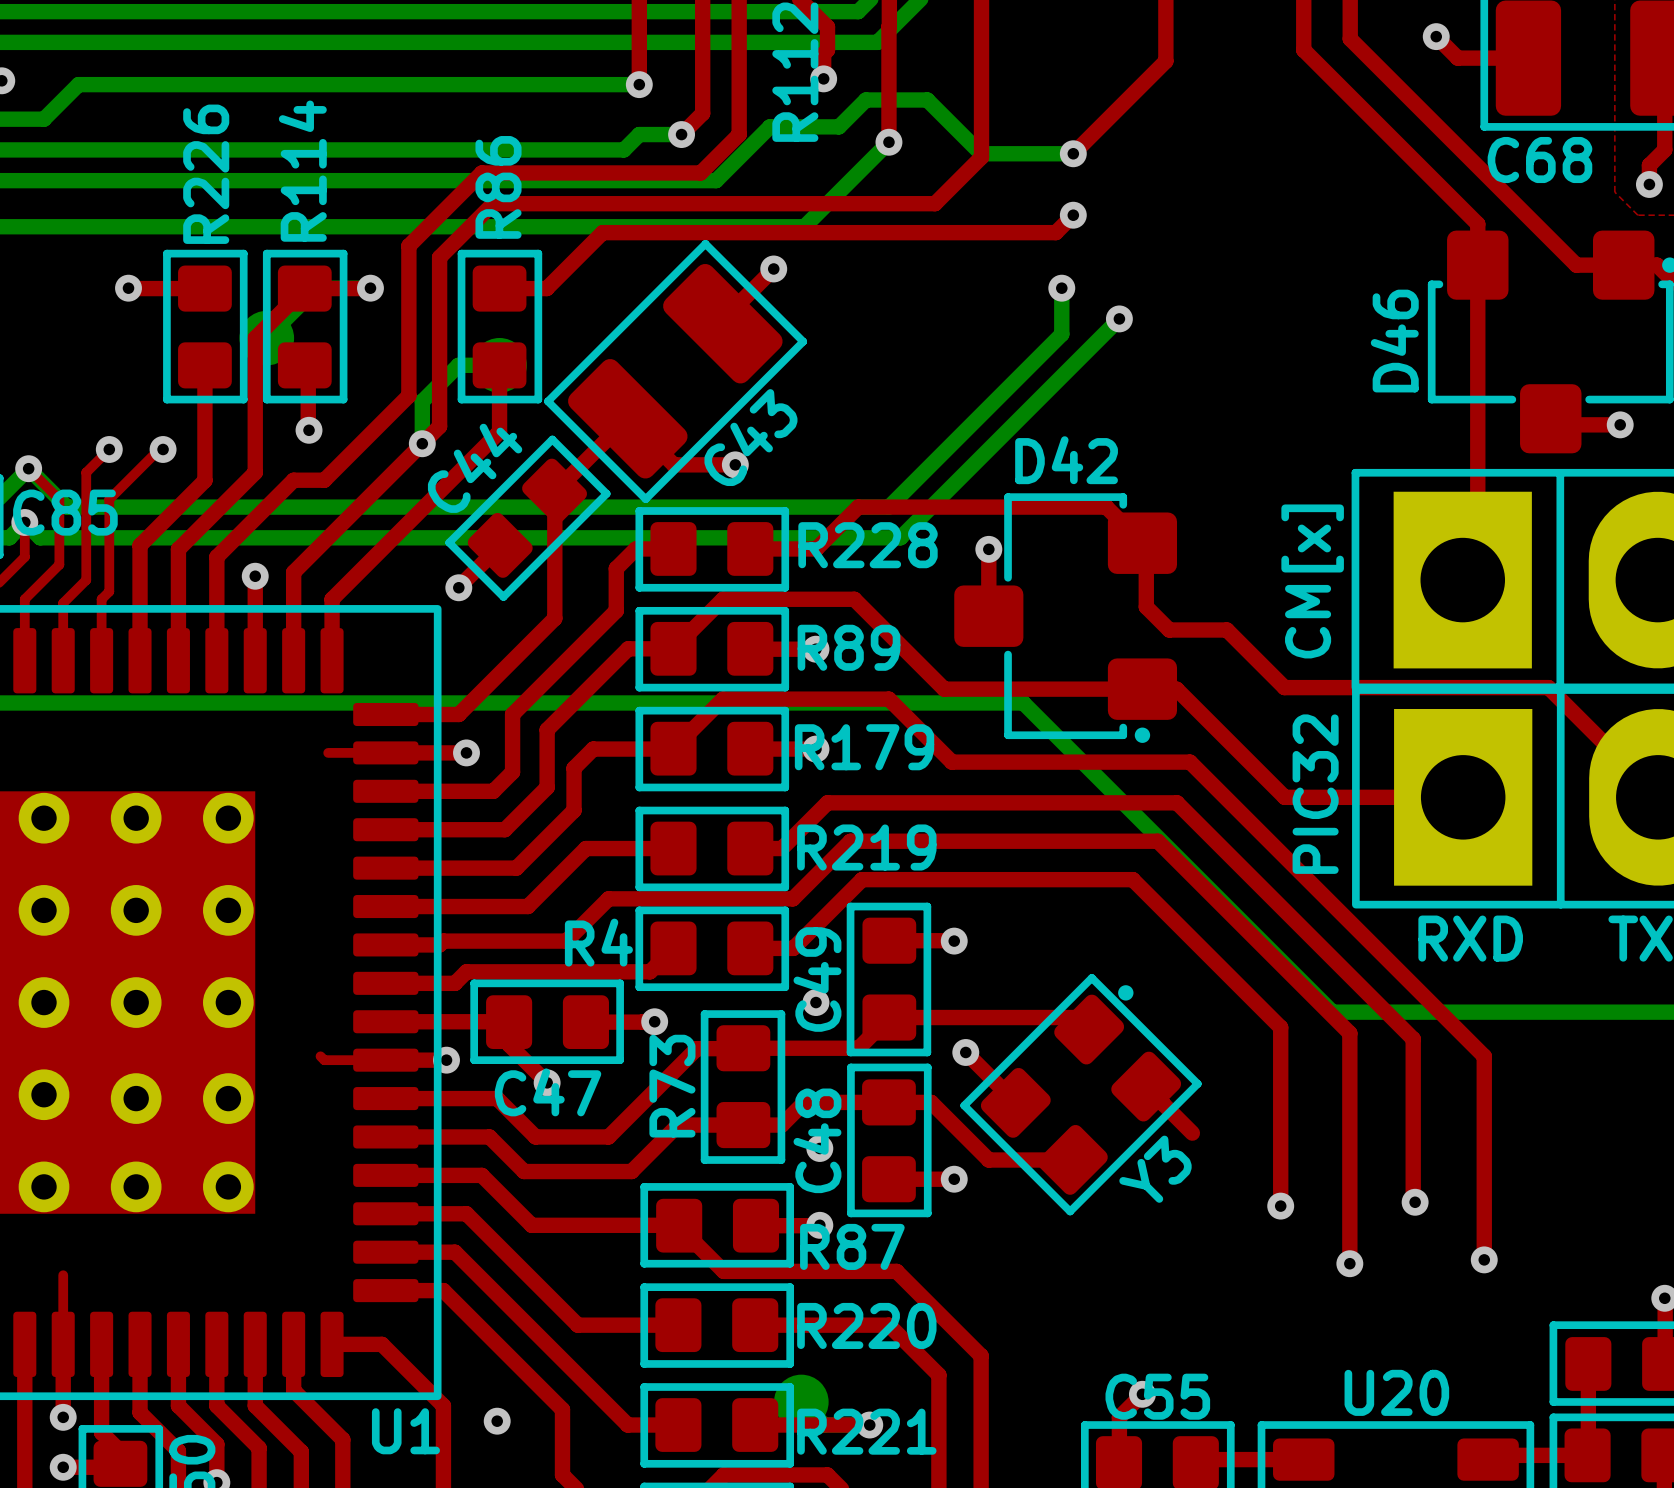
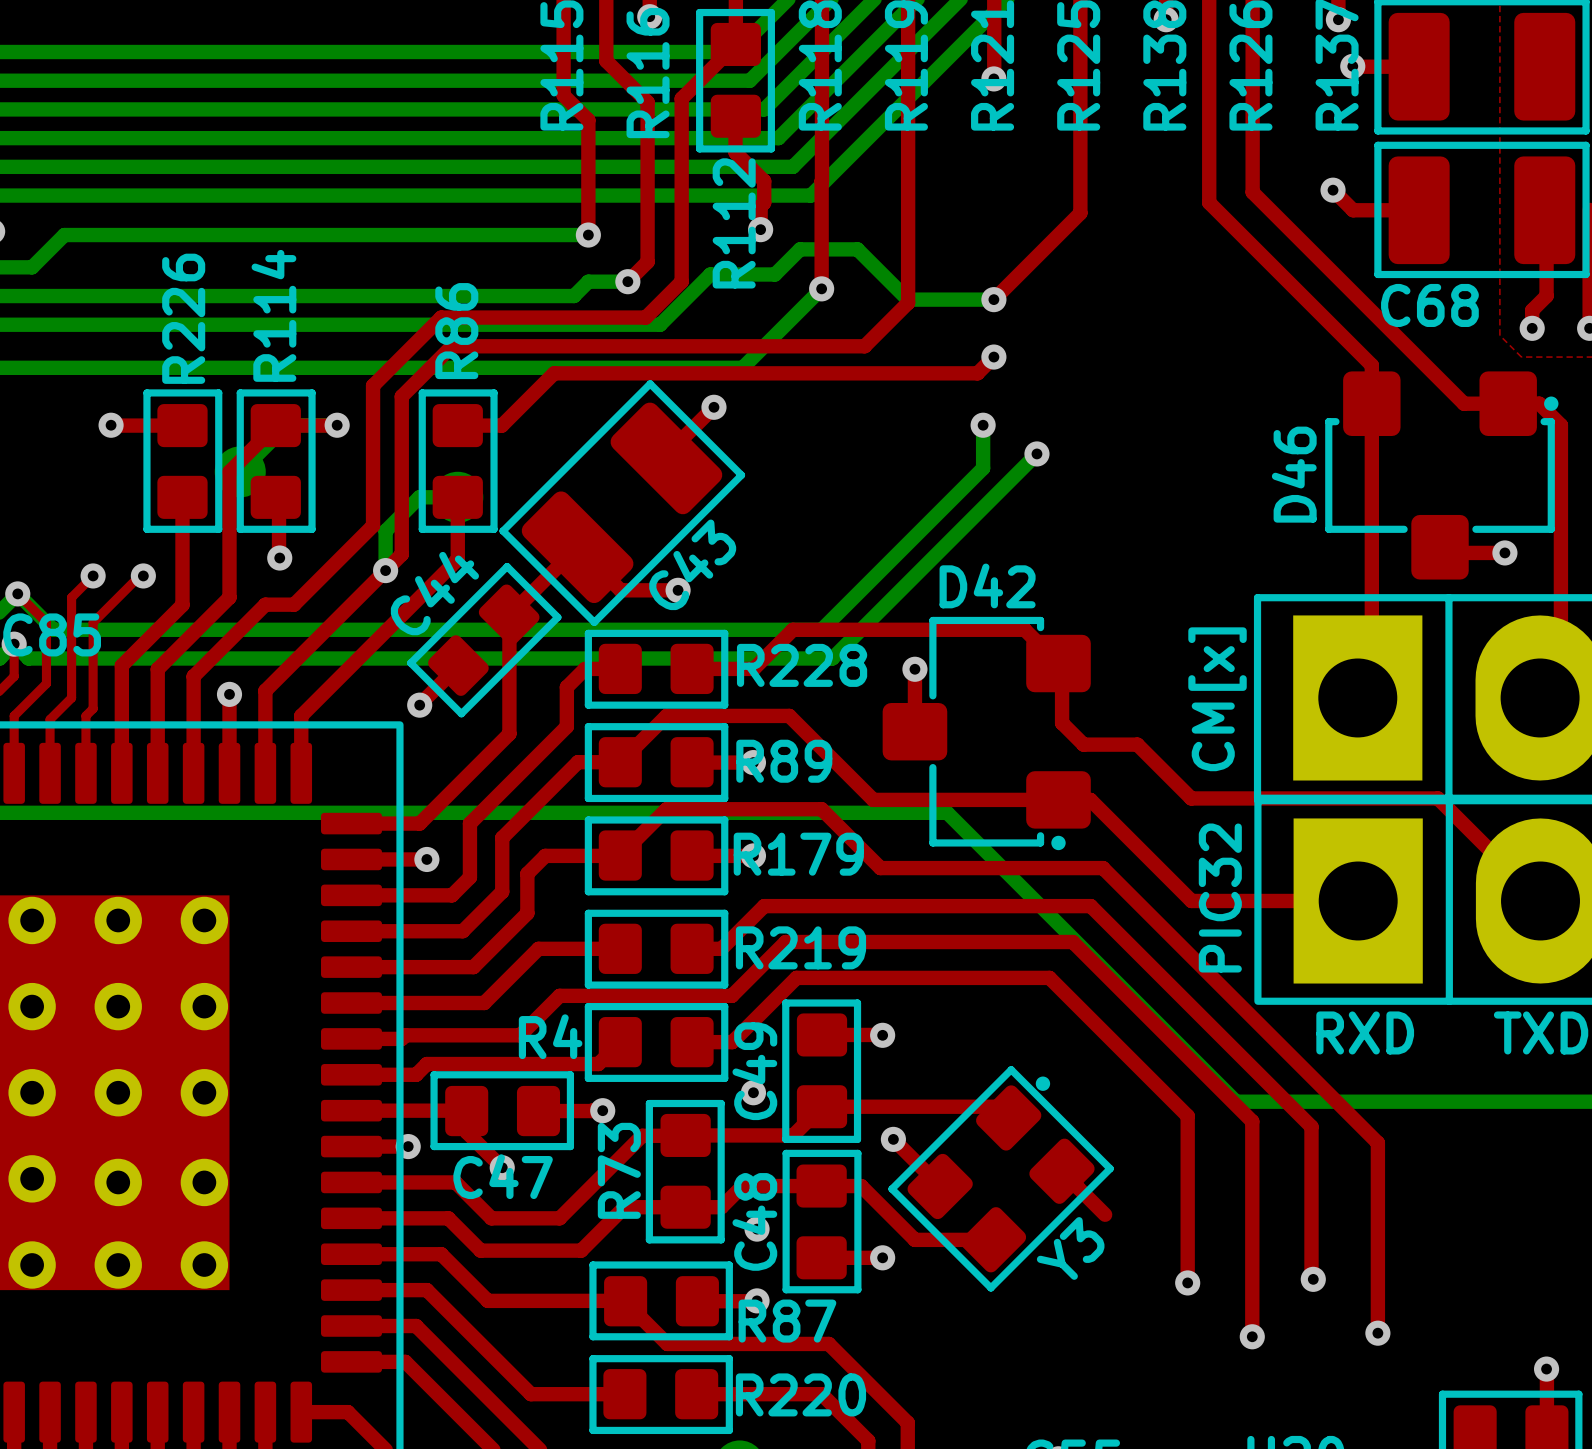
top track: (328, 752) (385, 752) -> none
top track: (320, 1056) (324, 1060) (385, 1060) -> none
top track: (63, 1275) (63, 1344) -> none

